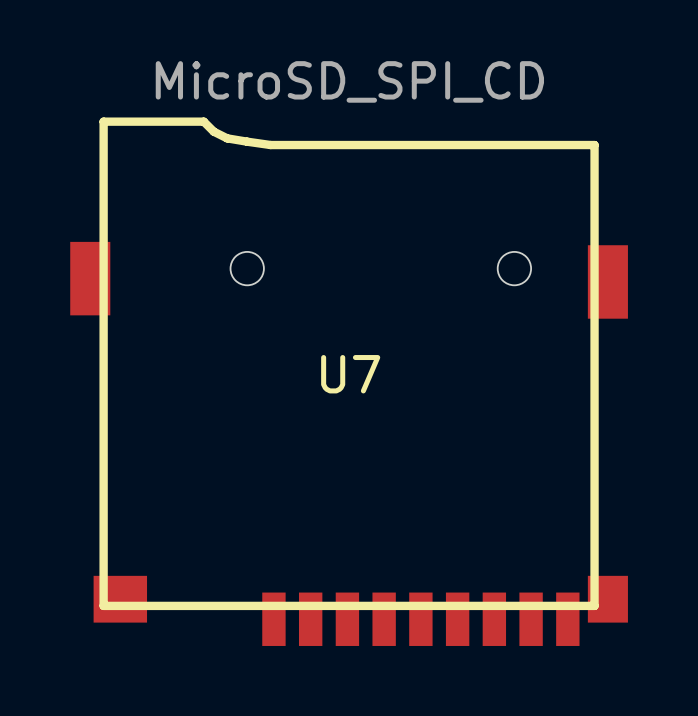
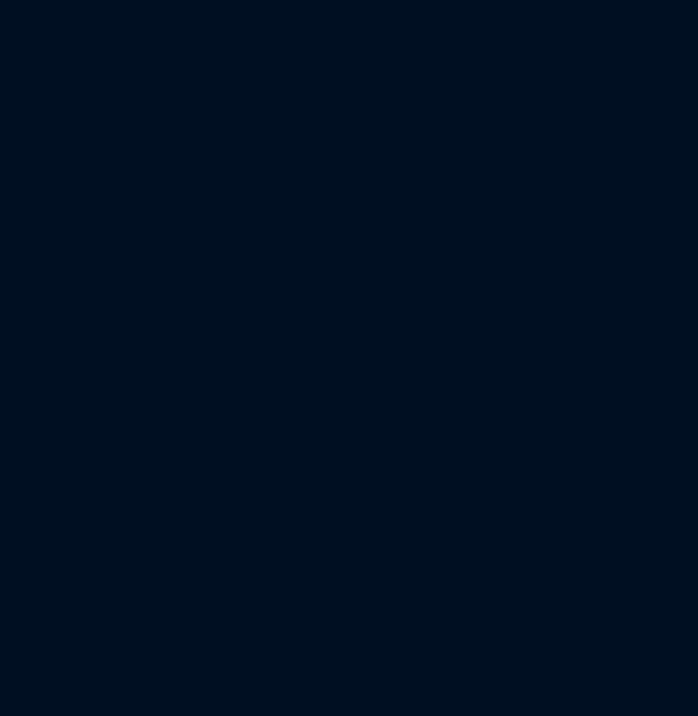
U7: MicroSD_SPI_CD (349, 381) -> none

